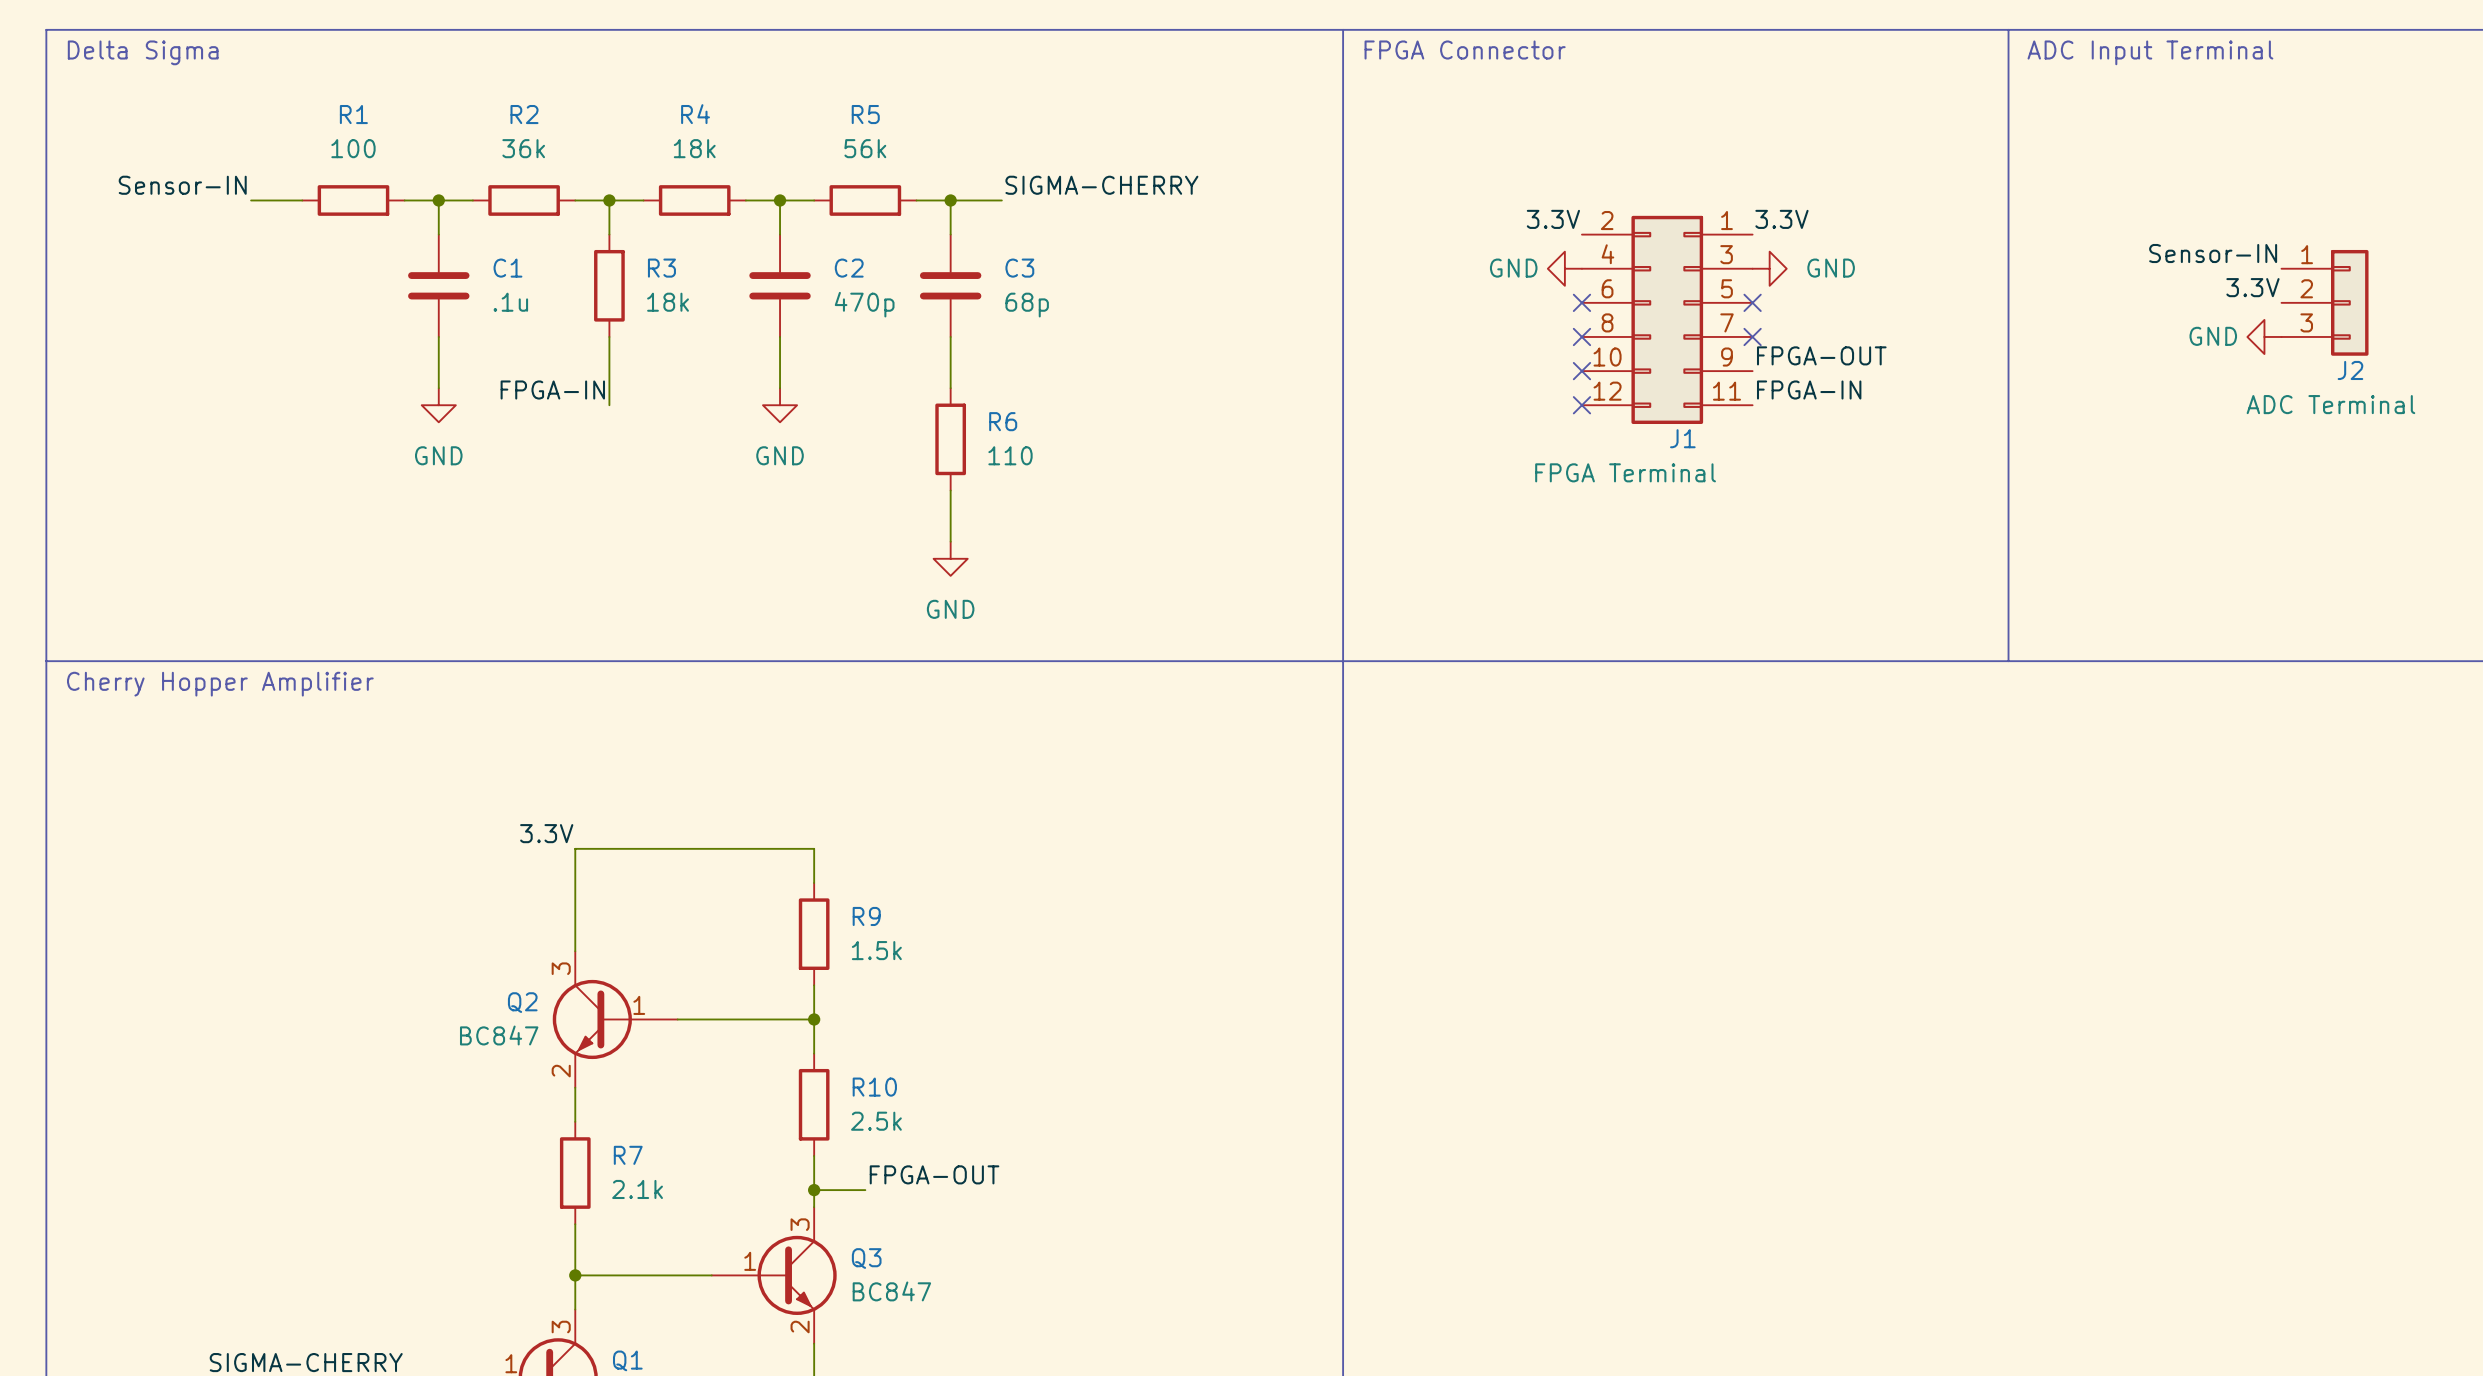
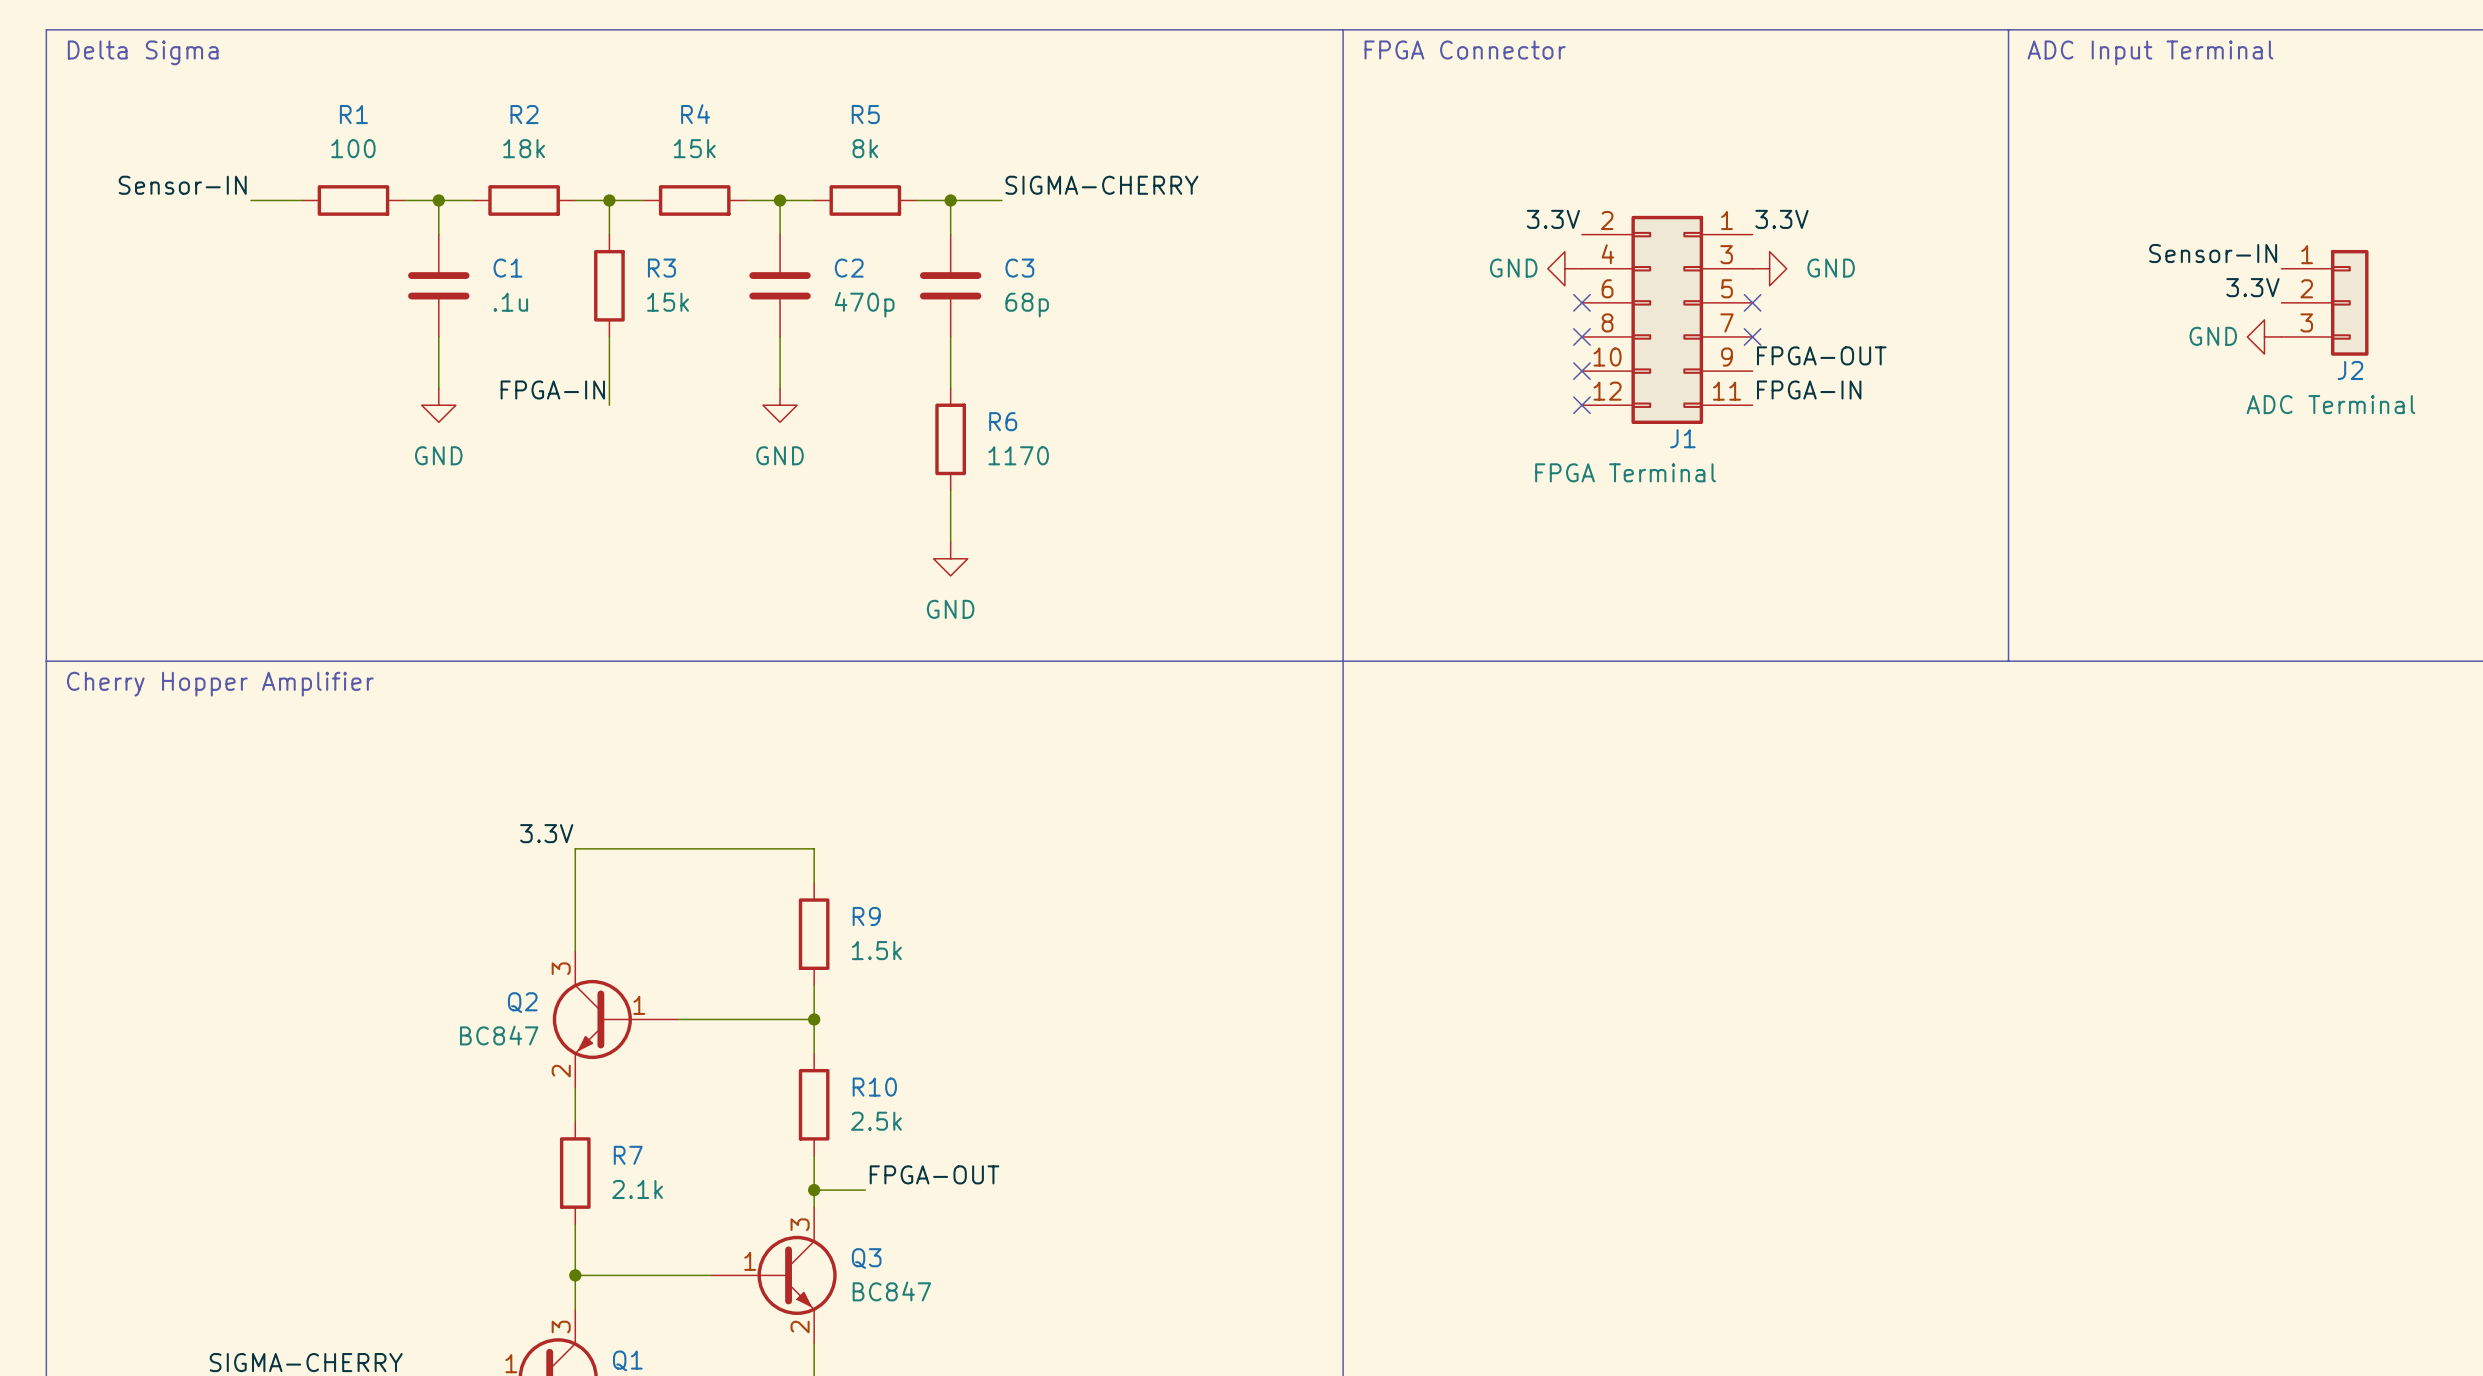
R2 value: 36k (523, 148) -> 18k (524, 148)
R4 value: 18k (694, 148) -> 15k (694, 148)
R5 value: 56k (865, 148) -> 8k (865, 148)
R3 value: 18k (668, 302) -> 15k (668, 302)
R6 value: 110 (1010, 455) -> 1170 (1018, 455)

